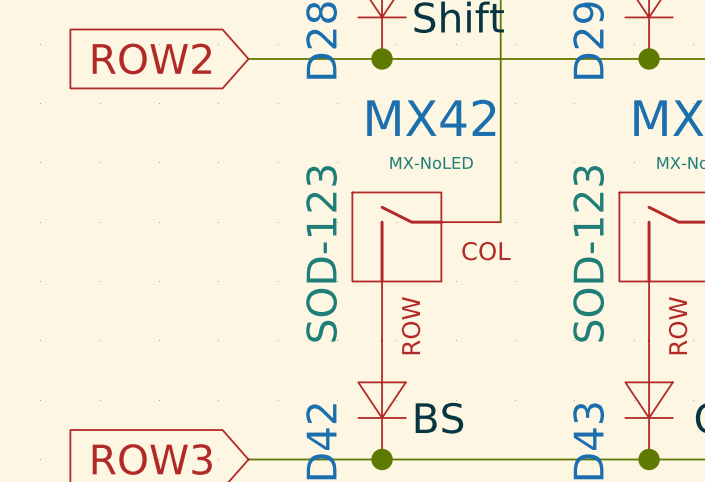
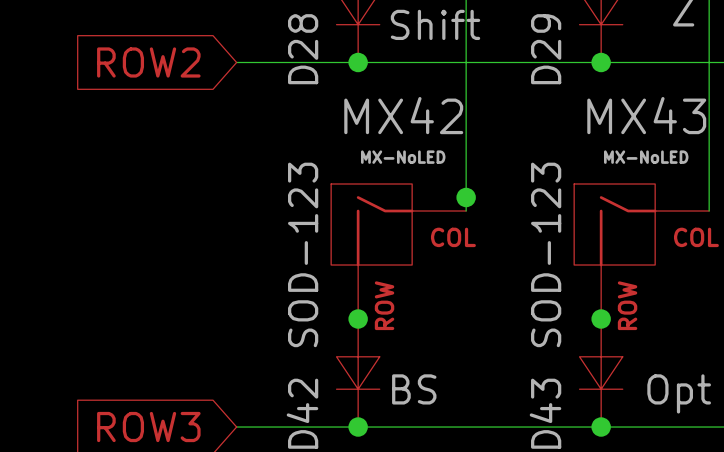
junction: none -> (466, 197)
junction: none -> (358, 319)
junction: none -> (601, 319)

